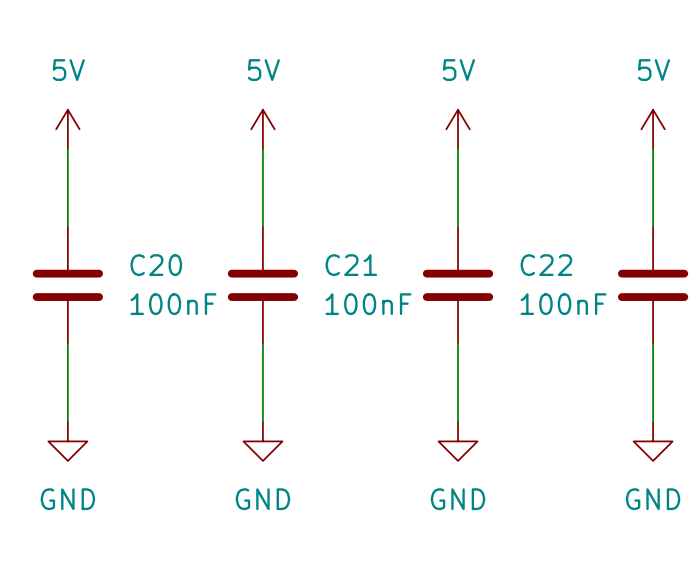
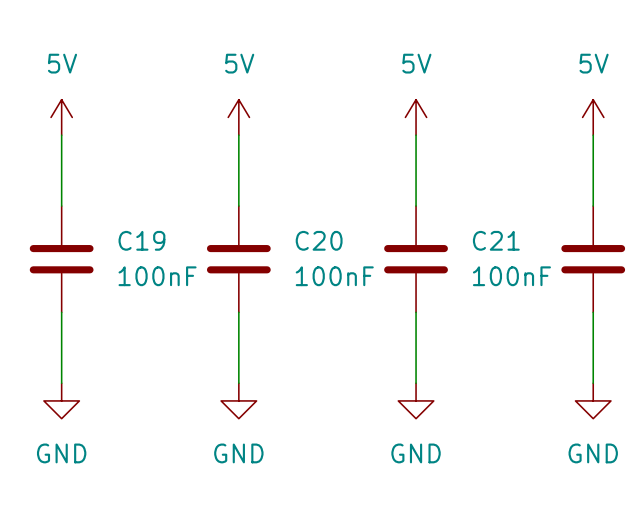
C20 name: C20 (156, 265) -> C19 (141, 240)
C21 name: C21 (351, 265) -> C20 (319, 240)
C22 name: C22 (546, 265) -> C21 (496, 240)

